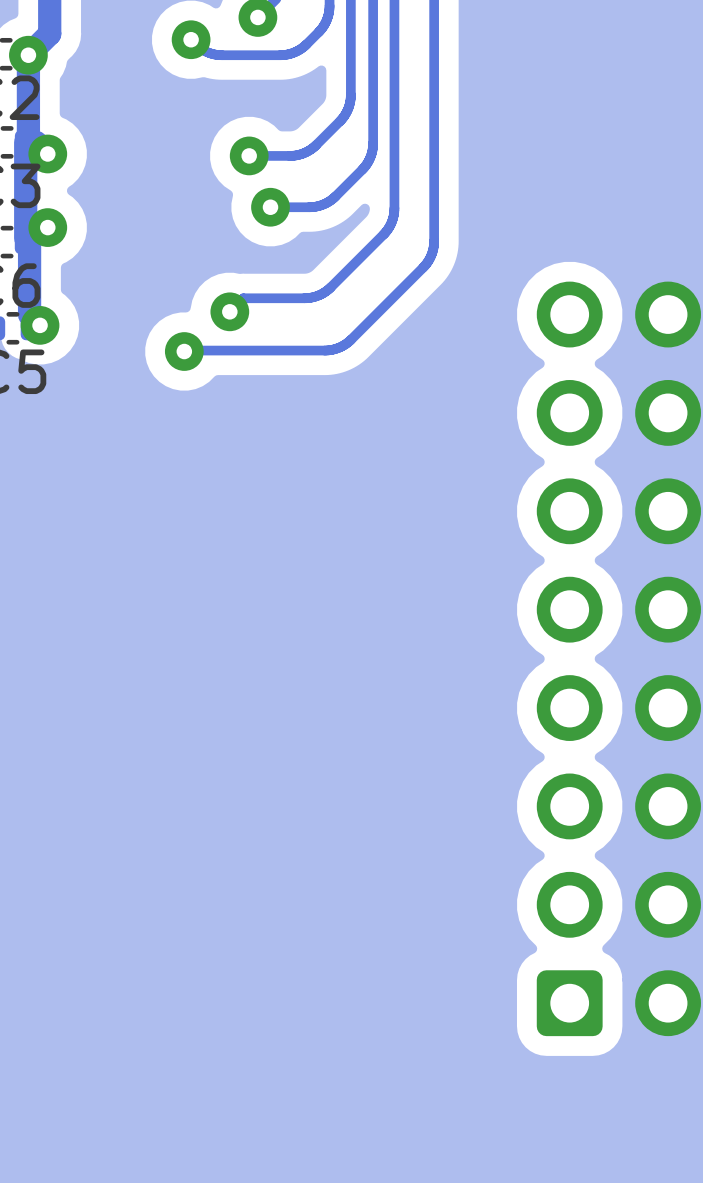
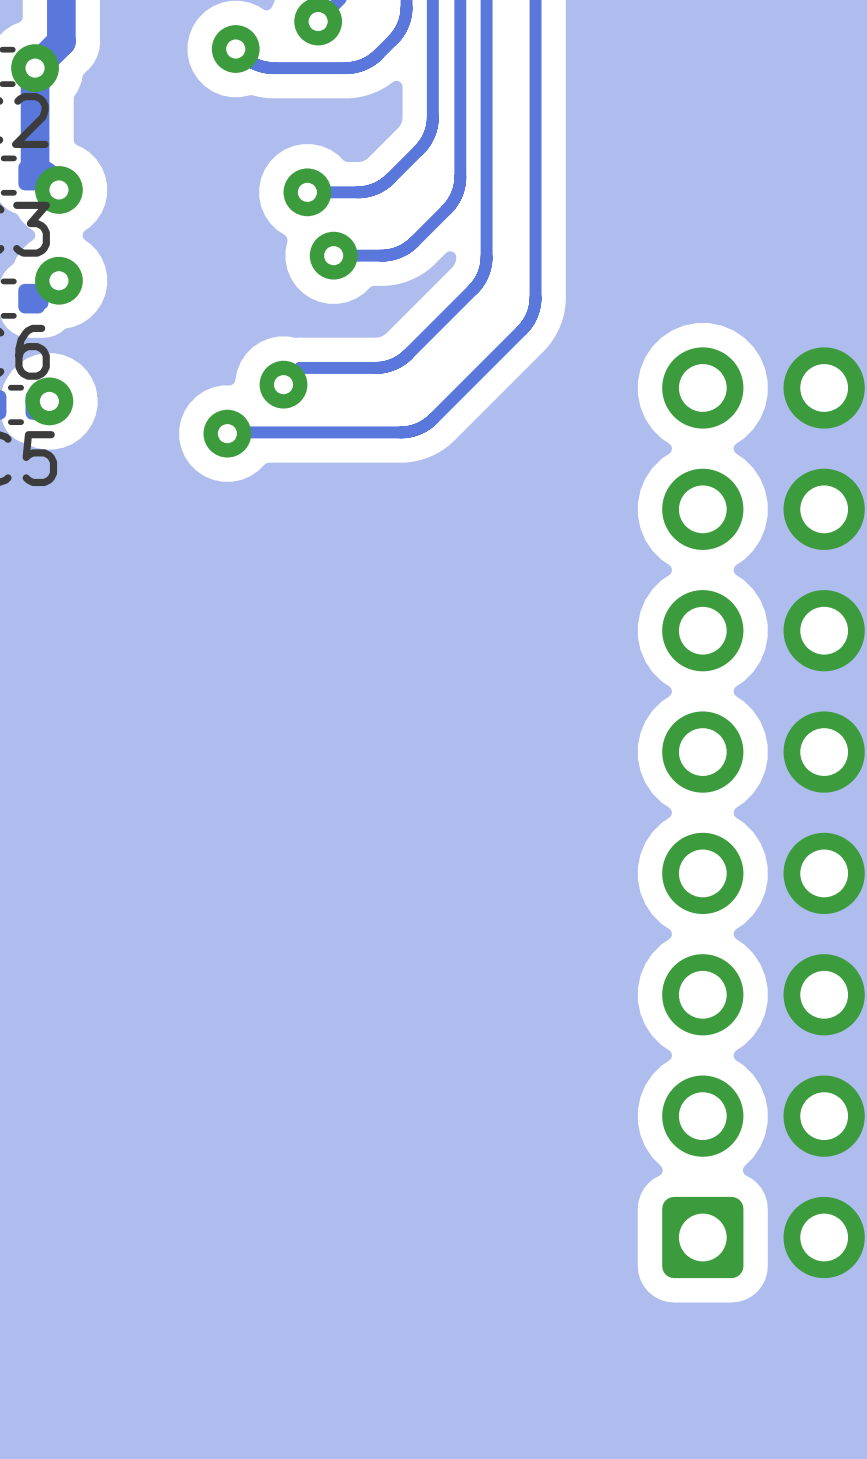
track: (25, 142) (25, 238) (29, 242) (29, 314) (40, 325) -> none

